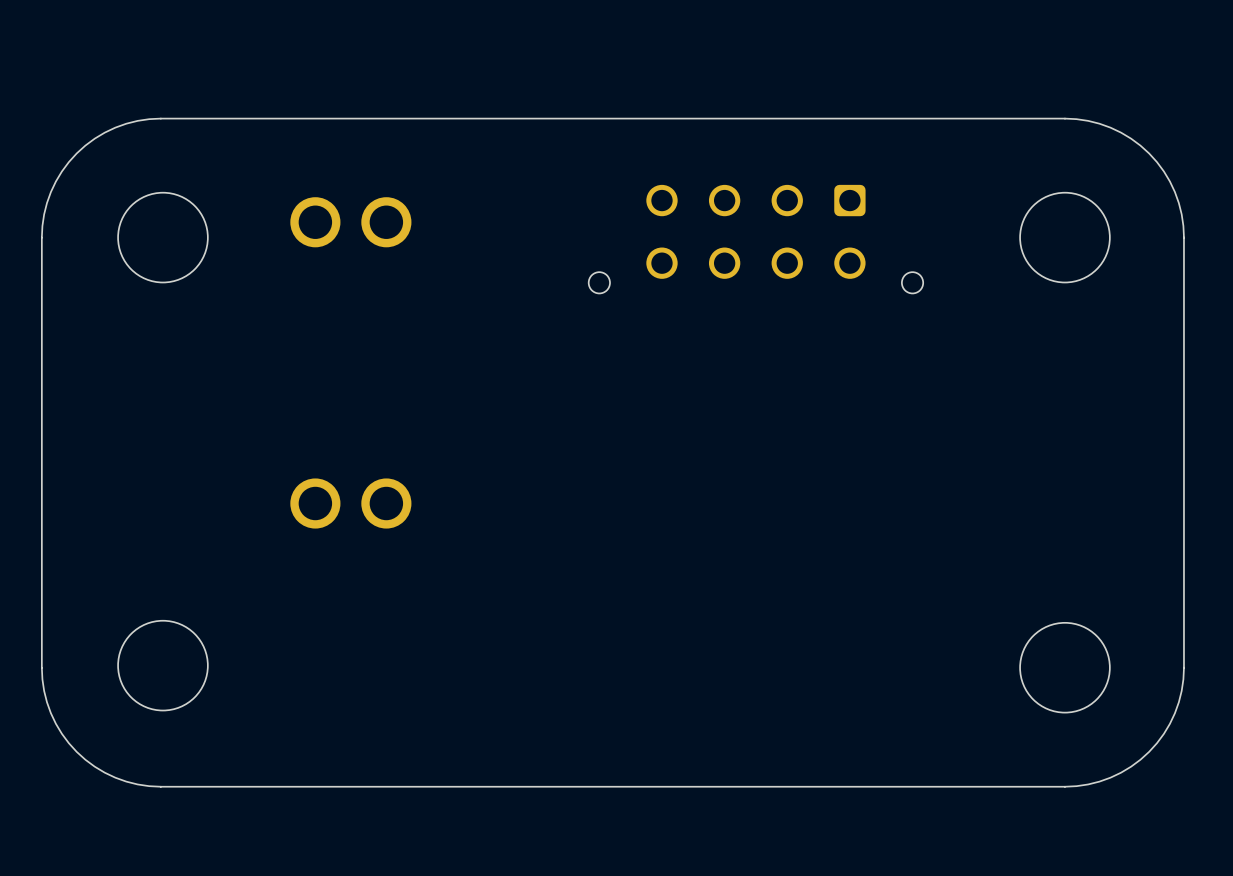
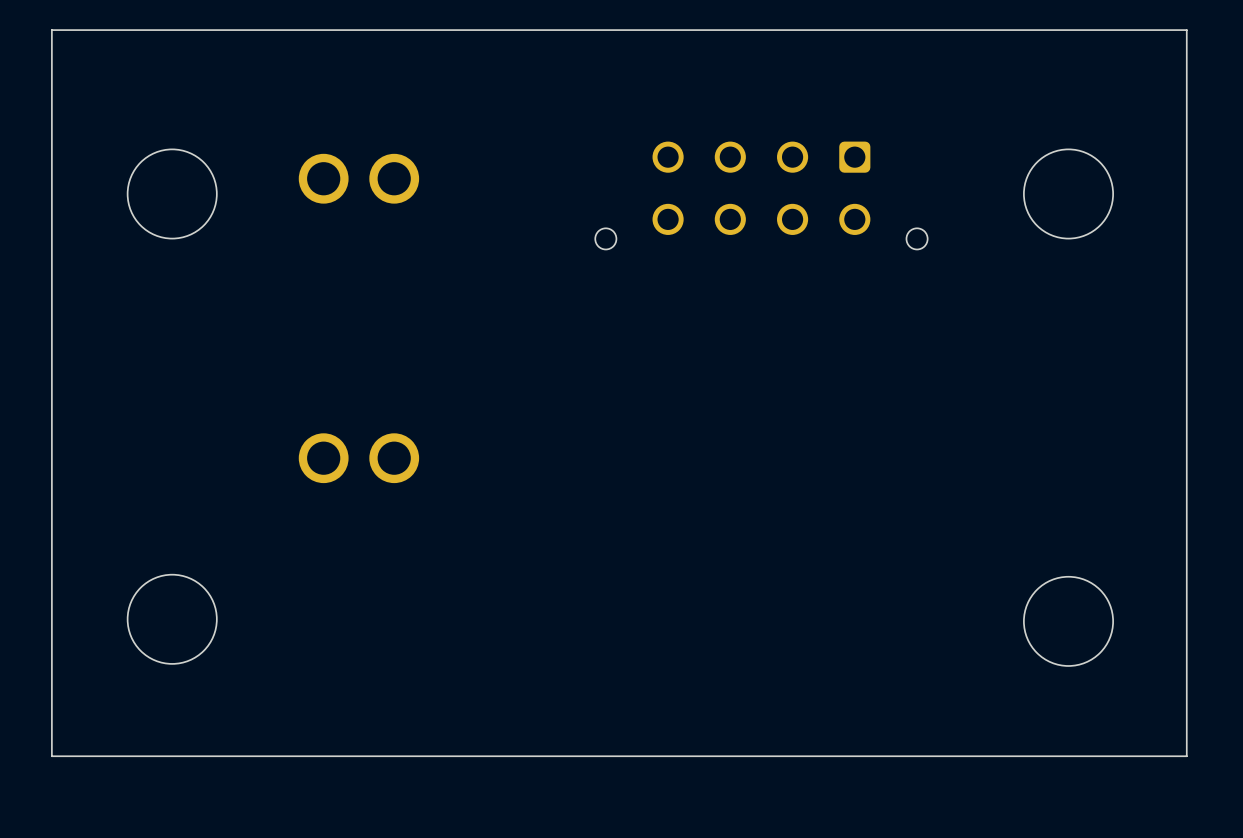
board edge: (1183, 237) (1181, 214) (1174, 192) (1163, 171) (1149, 153) (1131, 138) (1110, 127) (1088, 120) (1064, 118) (149, 119) (126, 123) (104, 132) (85, 145) (68, 162) (55, 181) (46, 203) (41, 237) -> (1186, 193) (1186, 30) (51, 30) (51, 193)
board edge: (1183, 667) (1181, 690) (1174, 713) (1163, 733) (1149, 751) (1131, 766) (1110, 777) (1088, 784) (1064, 786) (149, 786) (126, 781) (104, 772) (85, 759) (68, 743) (50, 713) (44, 690) (41, 667) -> (1186, 621) (1186, 756) (51, 756) (51, 621)

